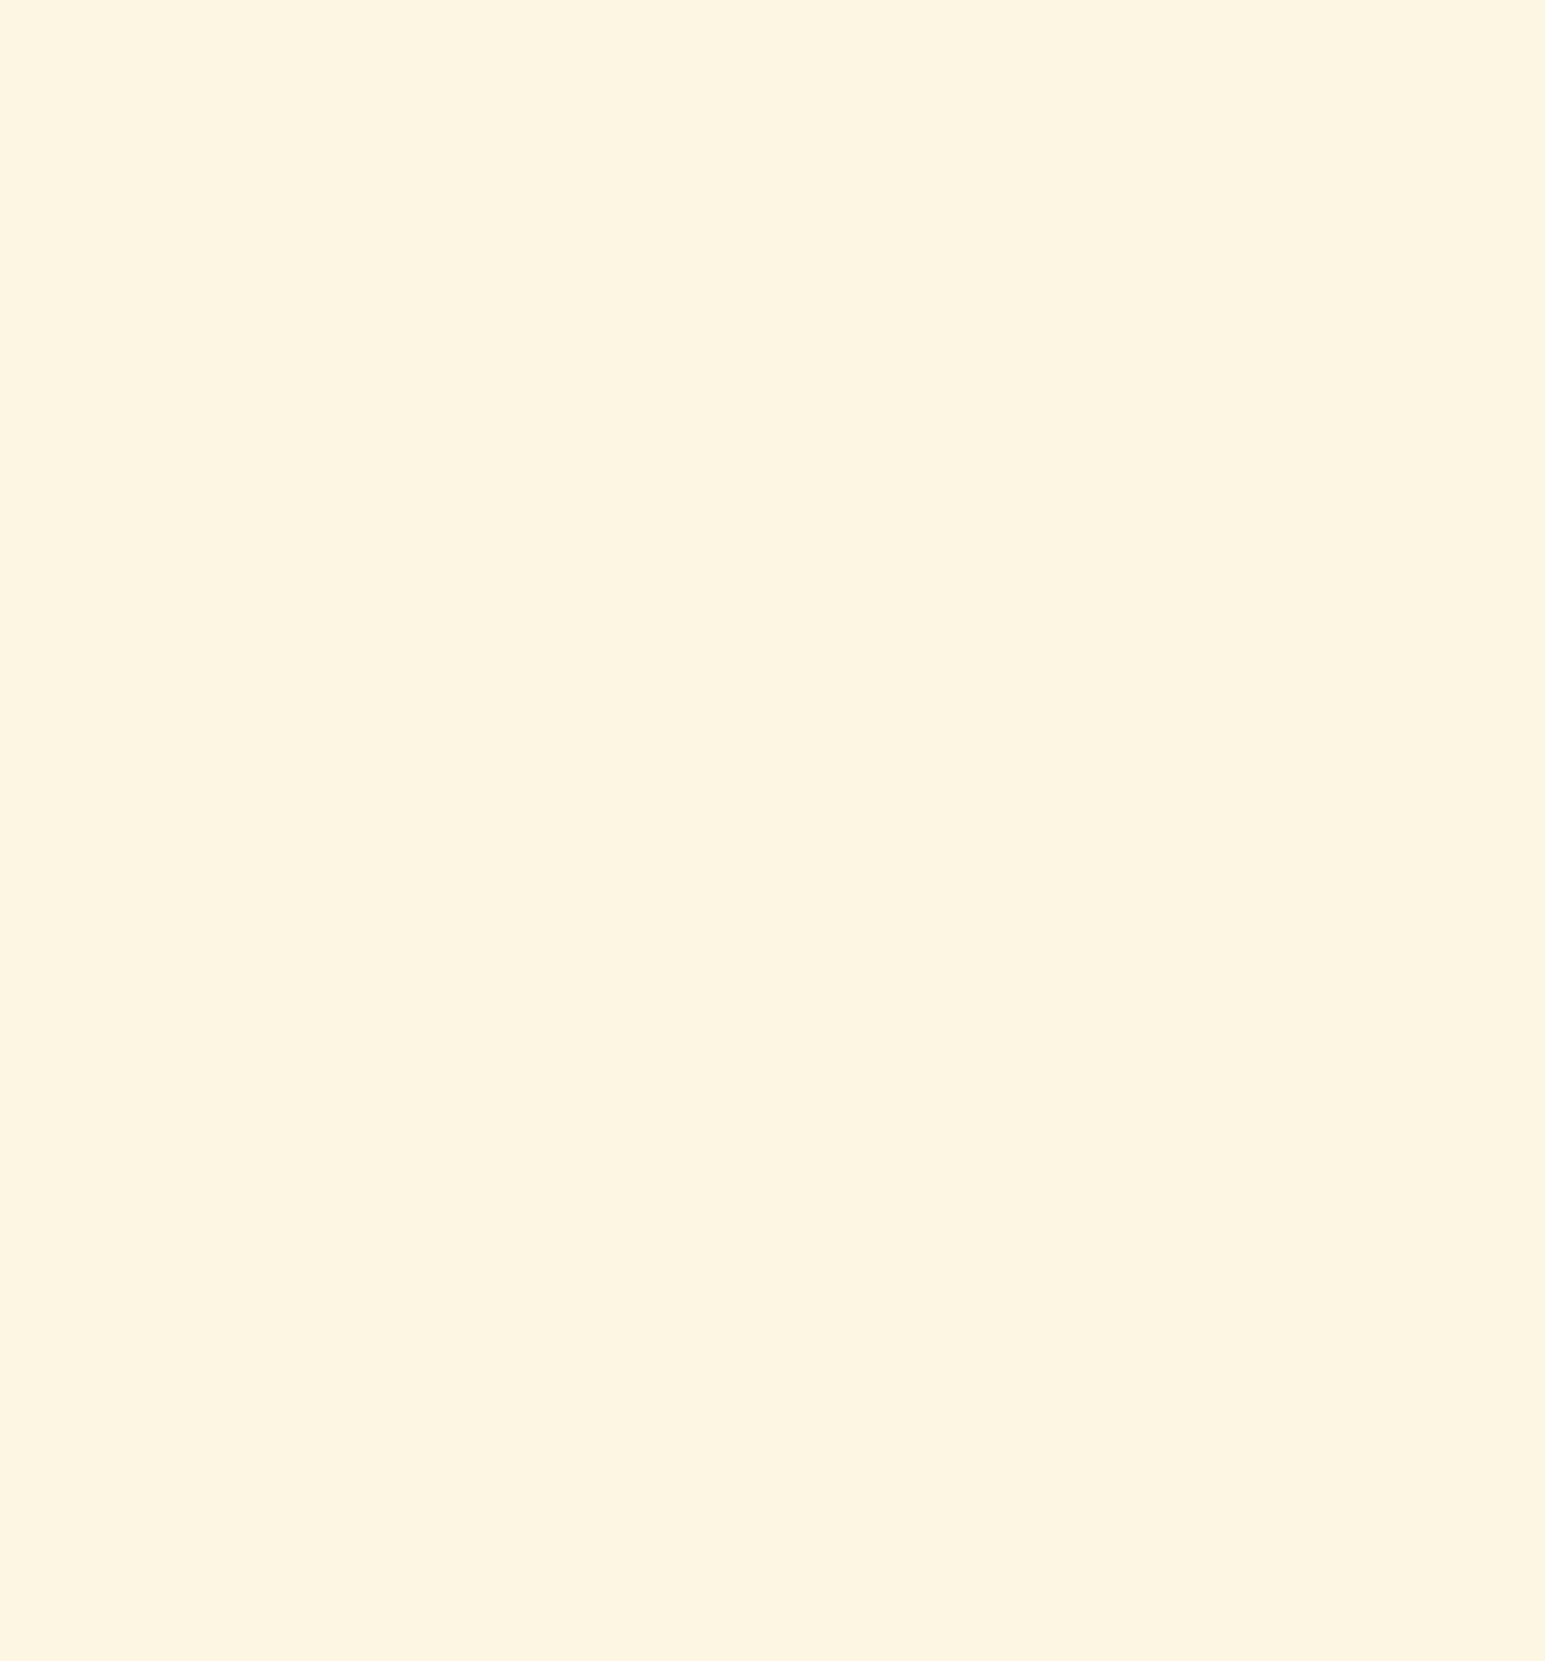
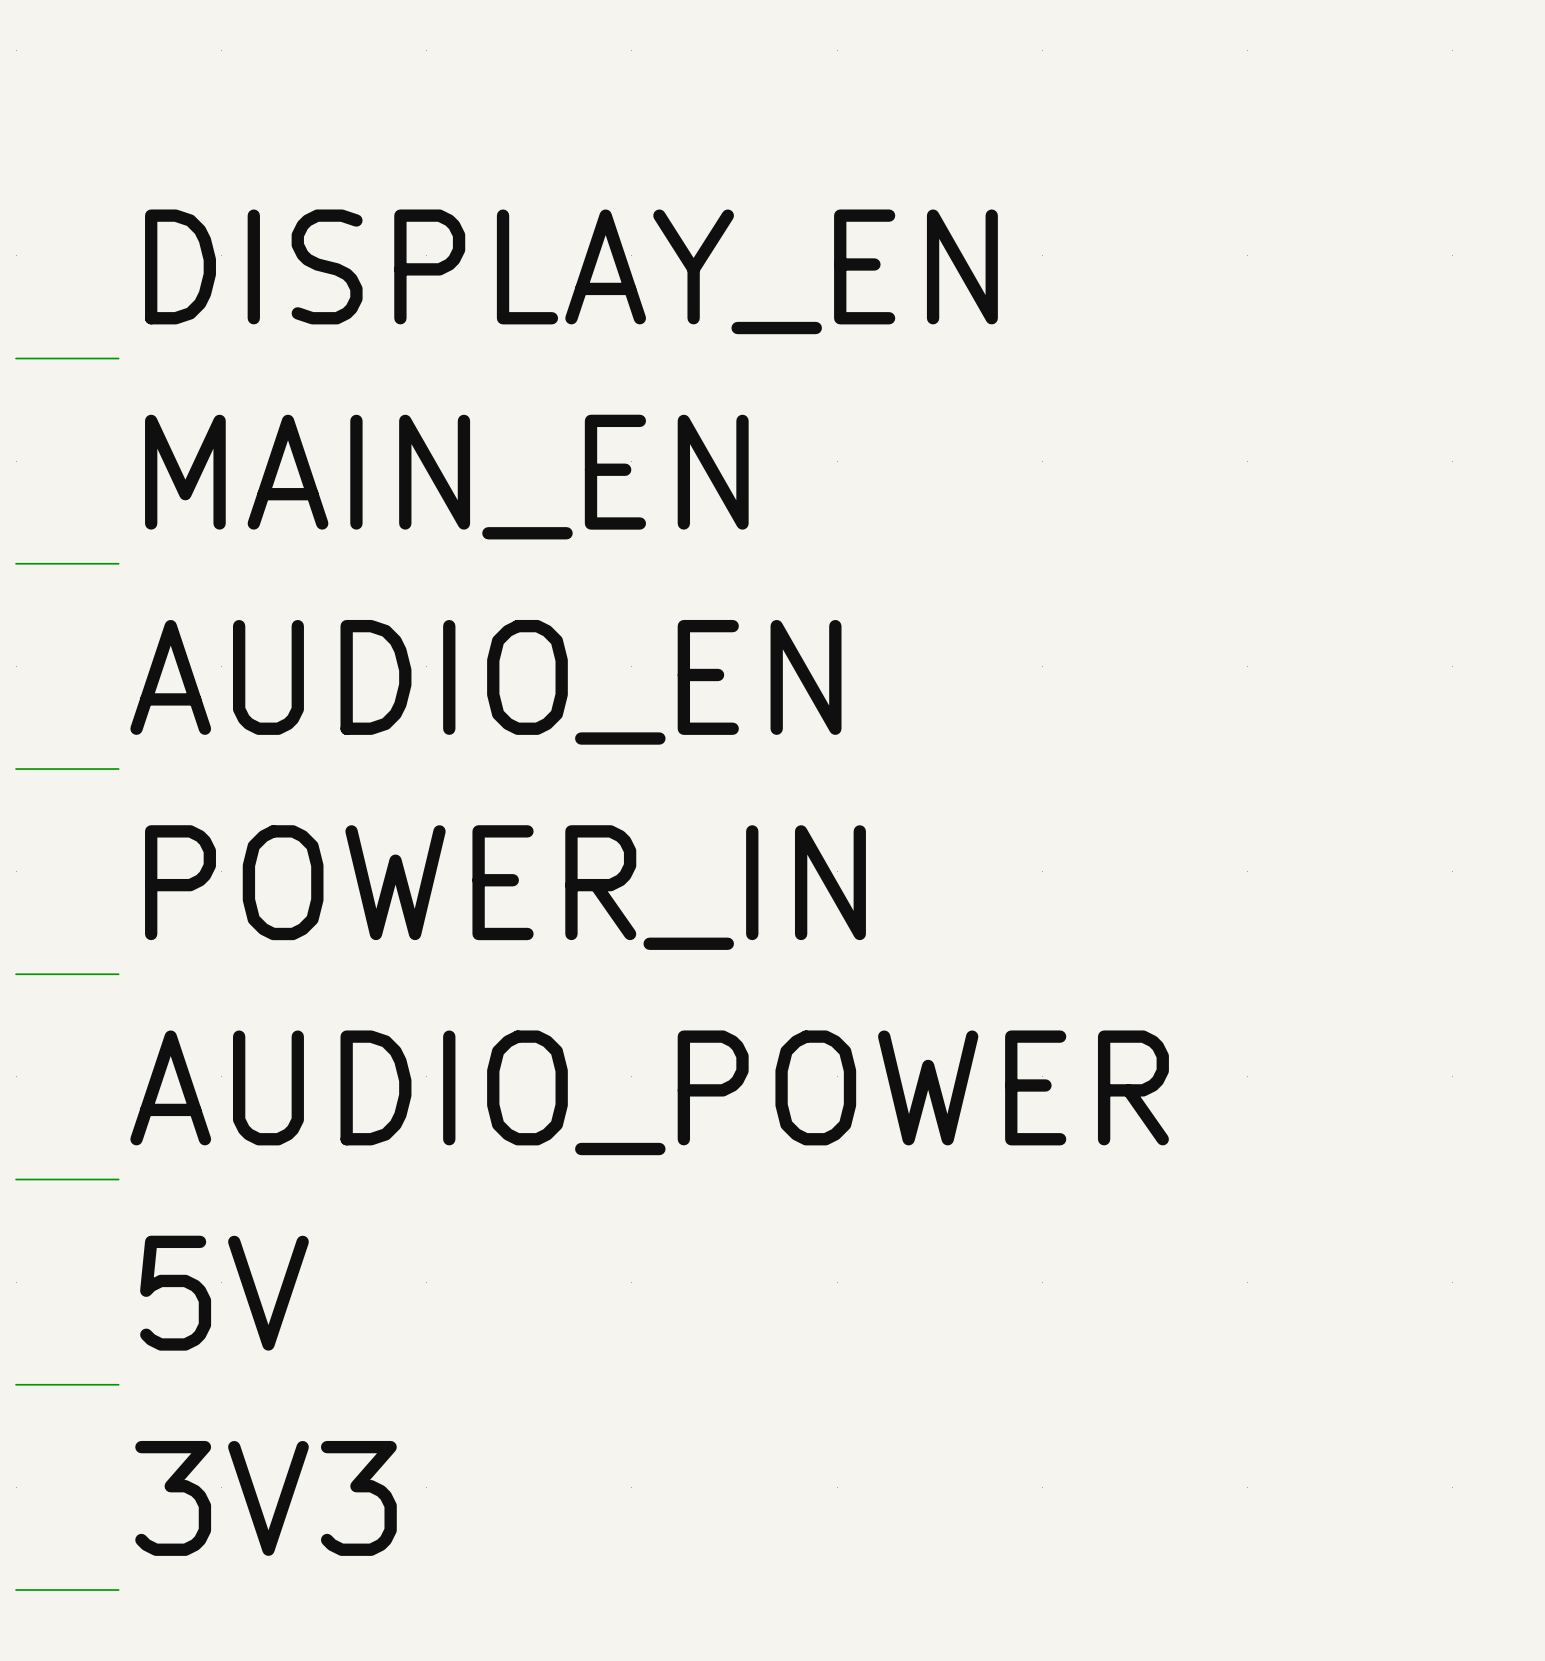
label: none -> DISPLAY_EN (571, 271)
wire: none -> (16, 358) (118, 358)
label: none -> MAIN_EN (446, 477)
wire: none -> (16, 563) (118, 563)
label: none -> AUDIO_EN (485, 682)
wire: none -> (16, 769) (118, 769)
label: none -> POWER_IN (505, 887)
wire: none -> (16, 974) (118, 974)
label: none -> AUDIO_POWER (649, 1092)
wire: none -> (16, 1179) (118, 1179)
label: none -> 5V (224, 1293)
wire: none -> (16, 1384) (118, 1384)
label: none -> 3V3 (266, 1498)
wire: none -> (16, 1590) (118, 1590)

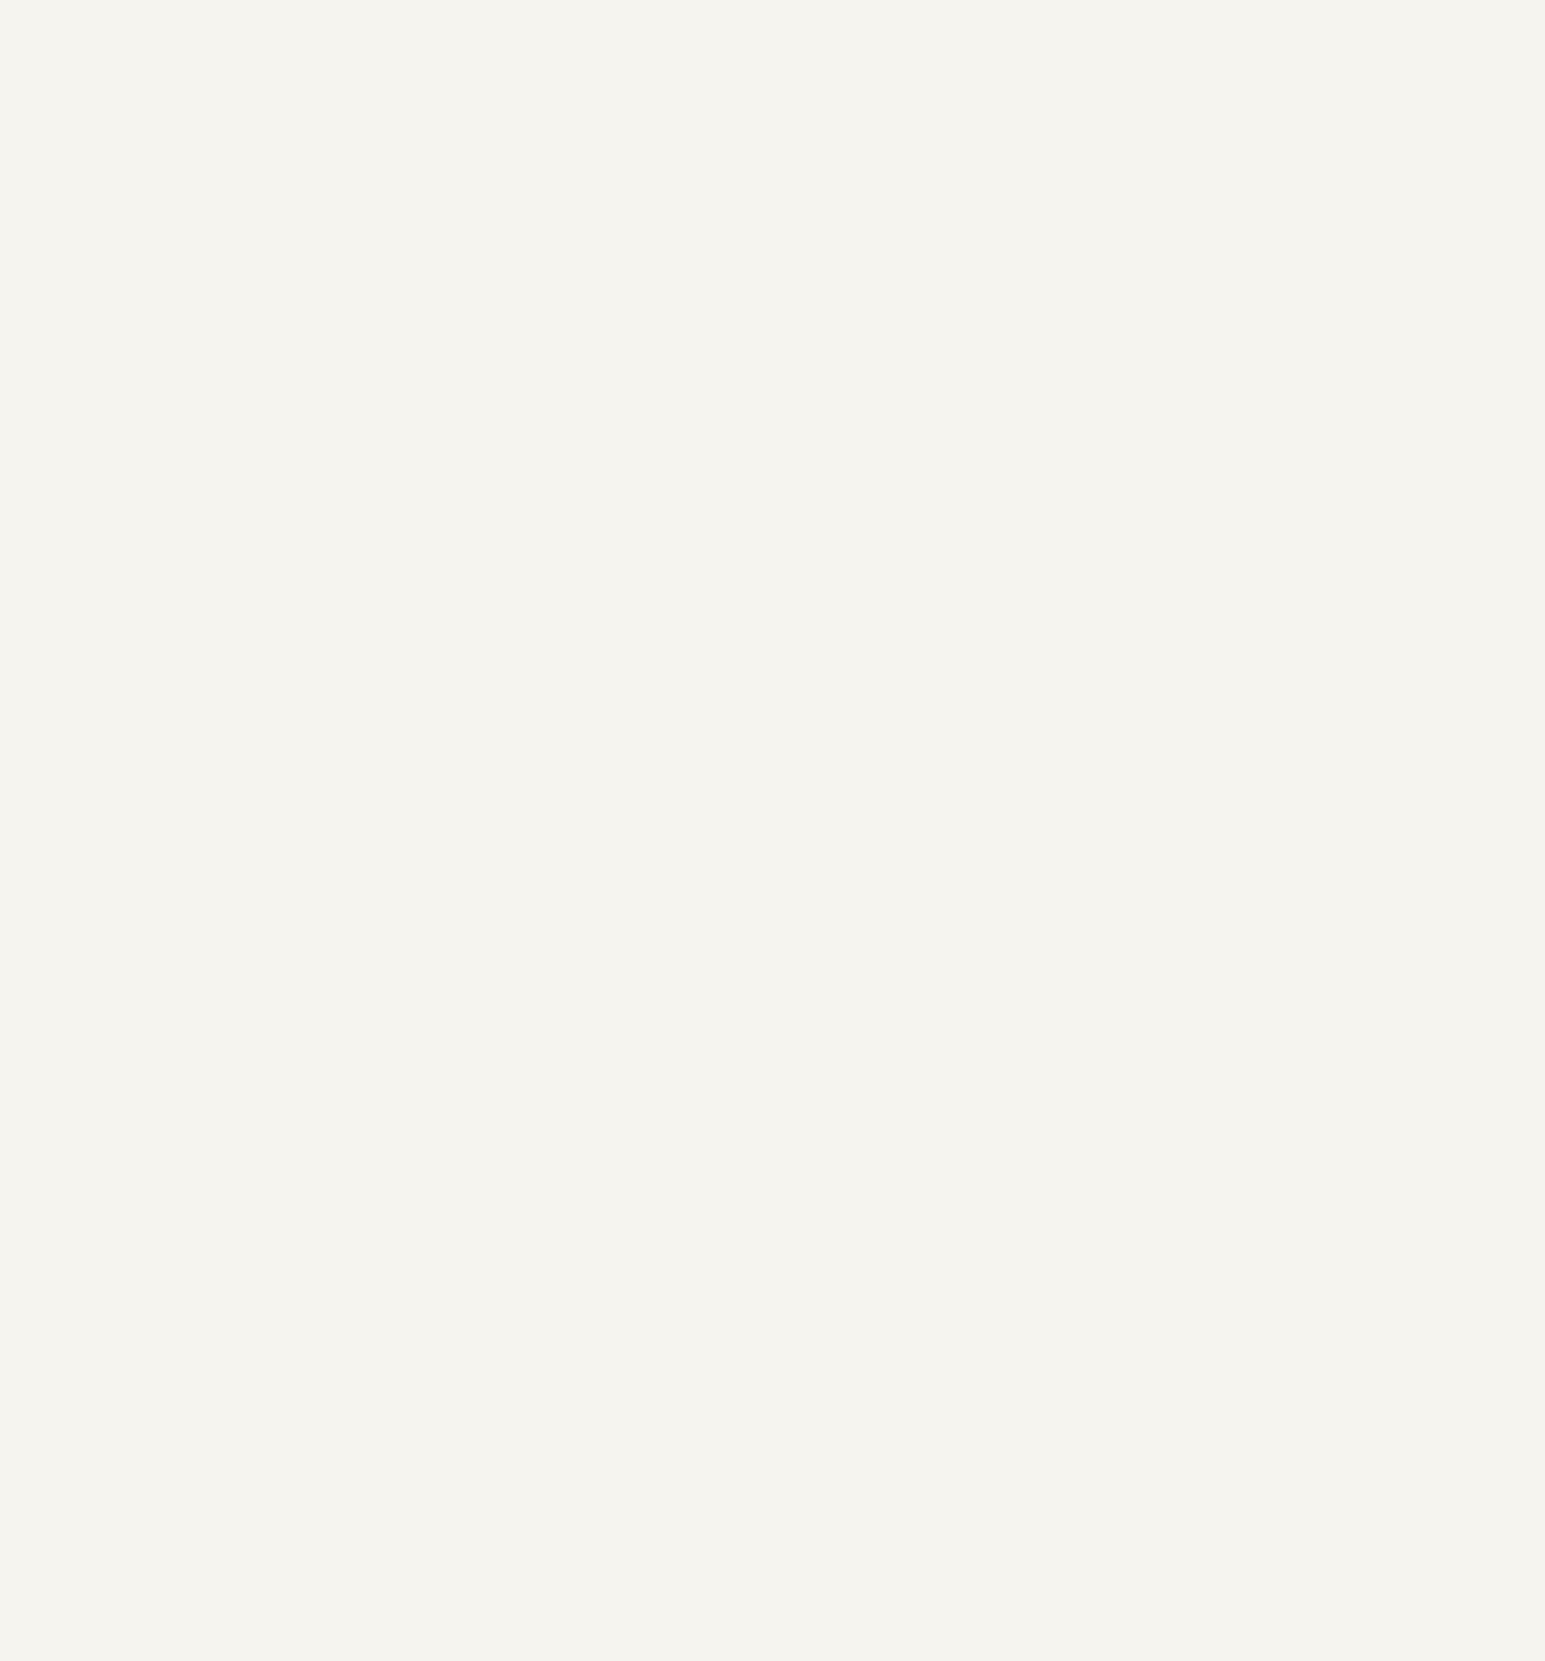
label: DISPLAY_EN (571, 271) -> none
wire: (16, 358) (118, 358) -> none
label: MAIN_EN (446, 477) -> none
wire: (16, 563) (118, 563) -> none
label: AUDIO_EN (485, 682) -> none
wire: (16, 769) (118, 769) -> none
label: POWER_IN (505, 887) -> none
wire: (16, 974) (118, 974) -> none
label: AUDIO_POWER (649, 1092) -> none
wire: (16, 1179) (118, 1179) -> none
label: 5V (224, 1293) -> none
wire: (16, 1384) (118, 1384) -> none
label: 3V3 (266, 1498) -> none
wire: (16, 1590) (118, 1590) -> none

